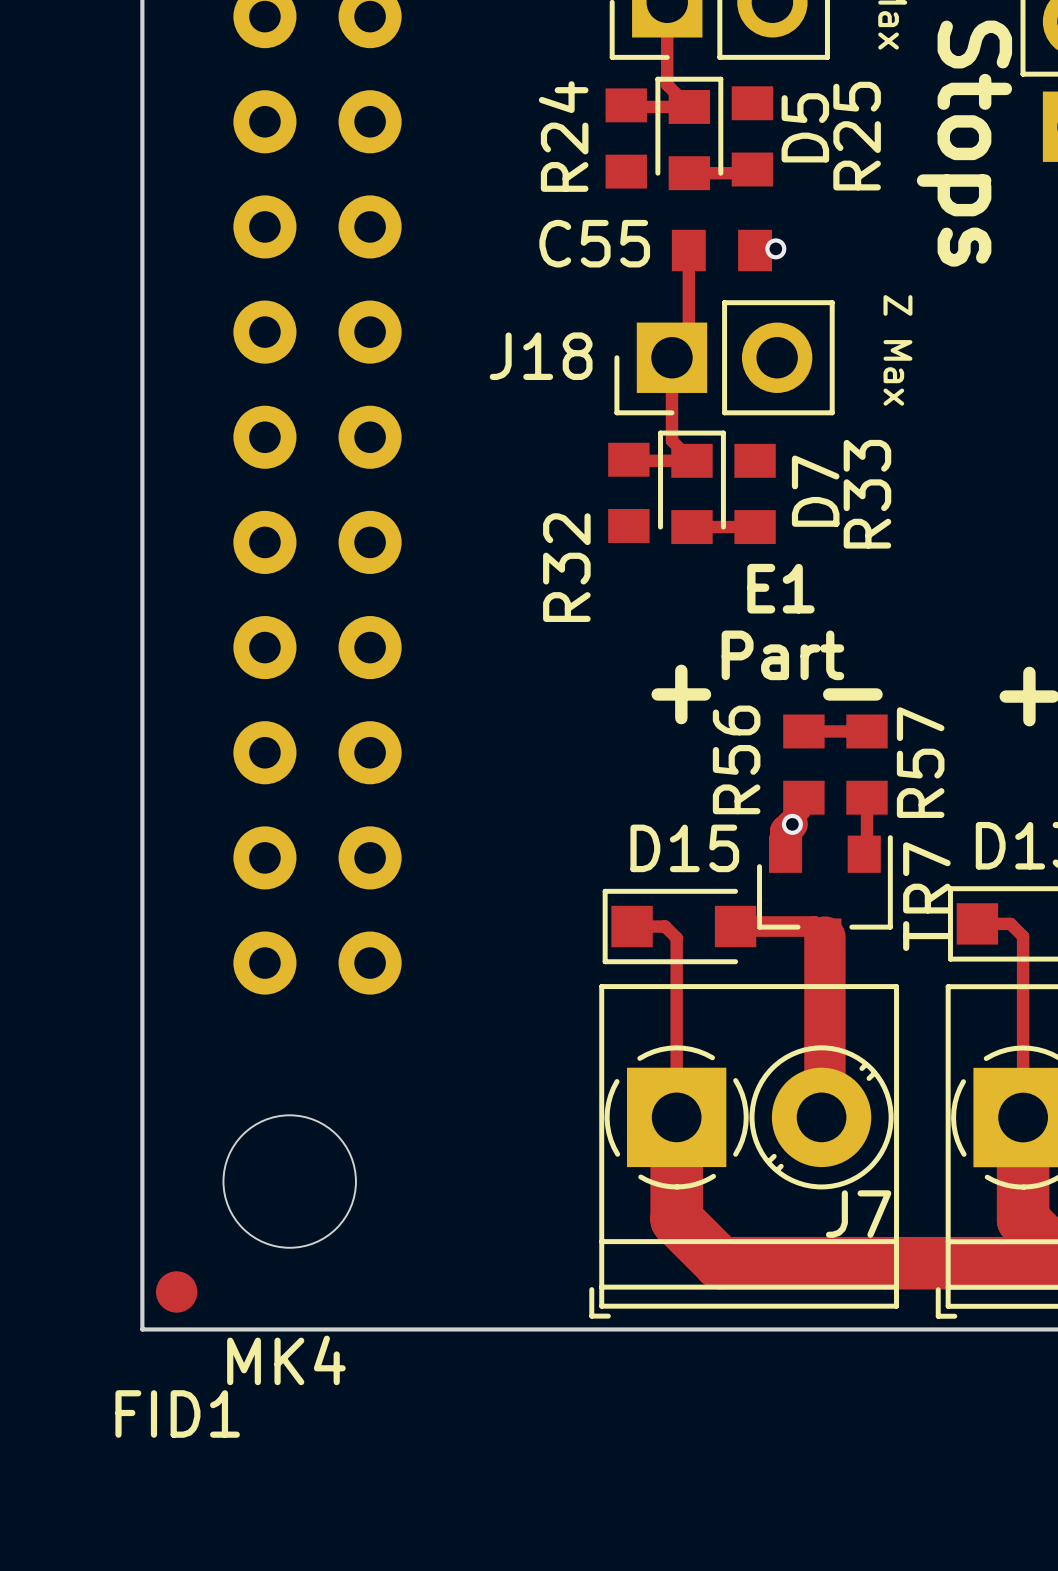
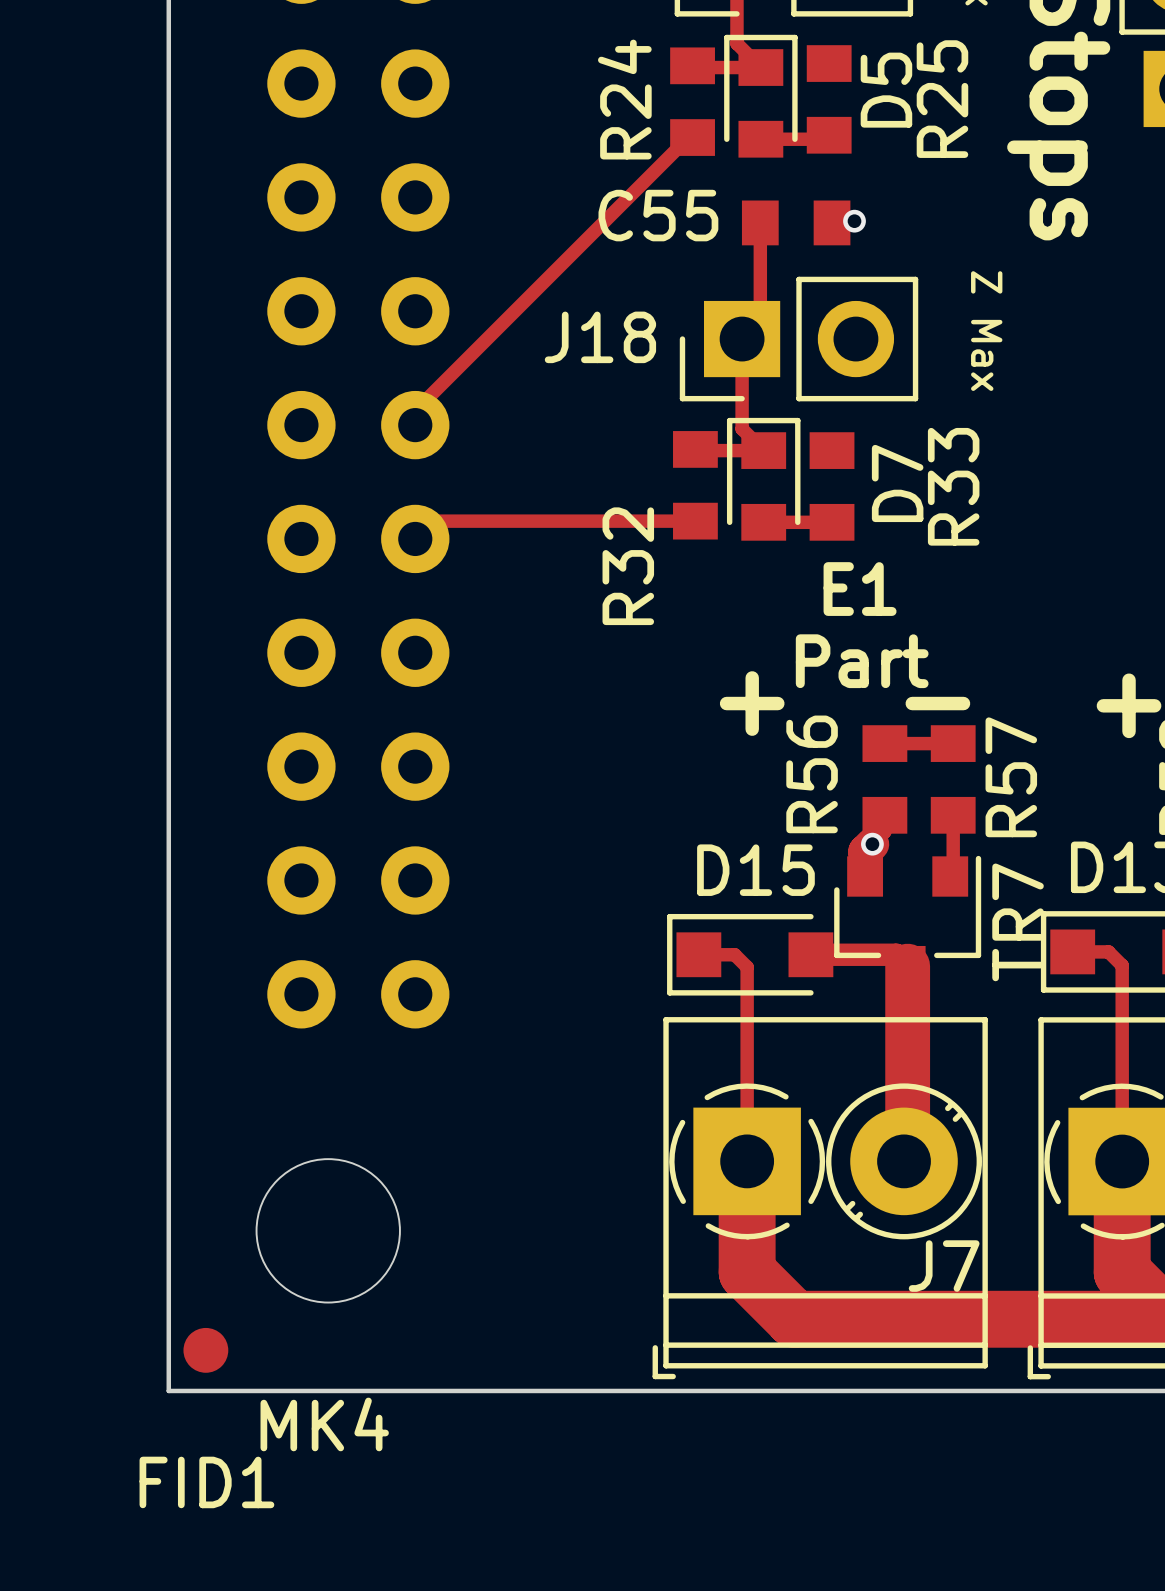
top track: none -> (692, 137) (688, 137) (415, 410) (415, 425)
top track: none -> (695, 521) (433, 521) (415, 538)

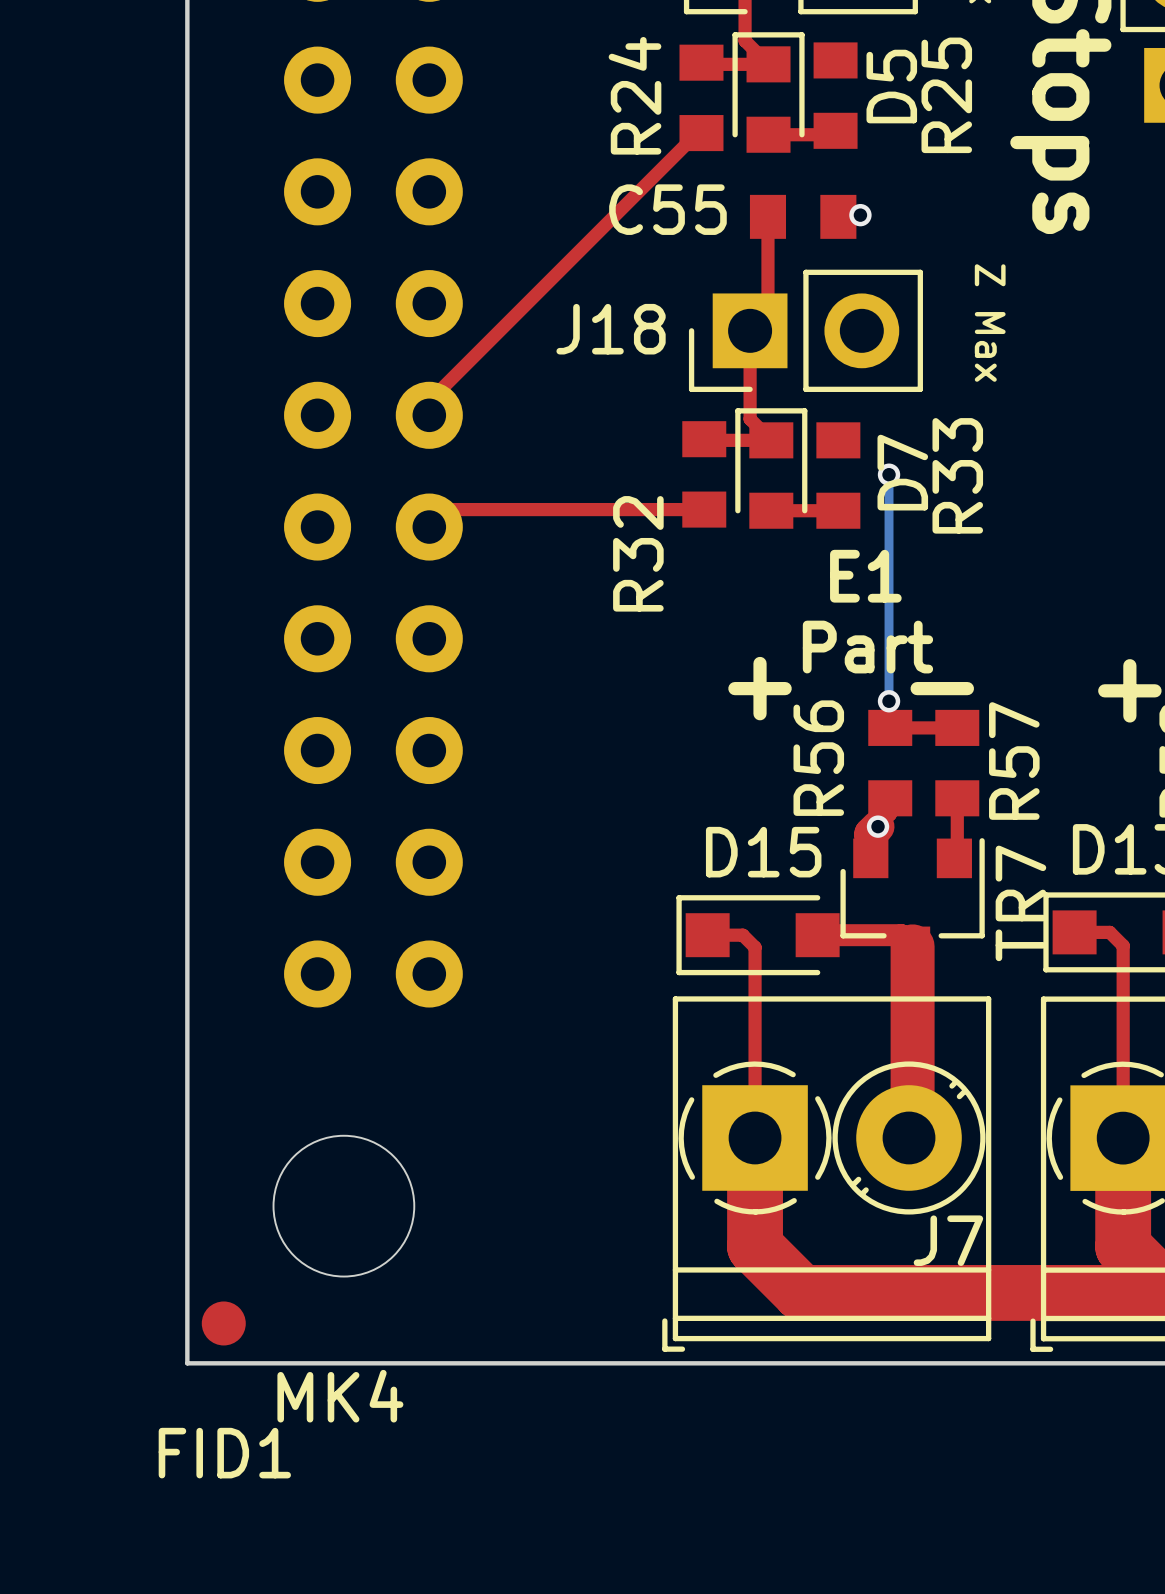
bottom track: none -> (889, 474) (889, 701)
via: none -> (889, 474)
via: none -> (889, 701)

